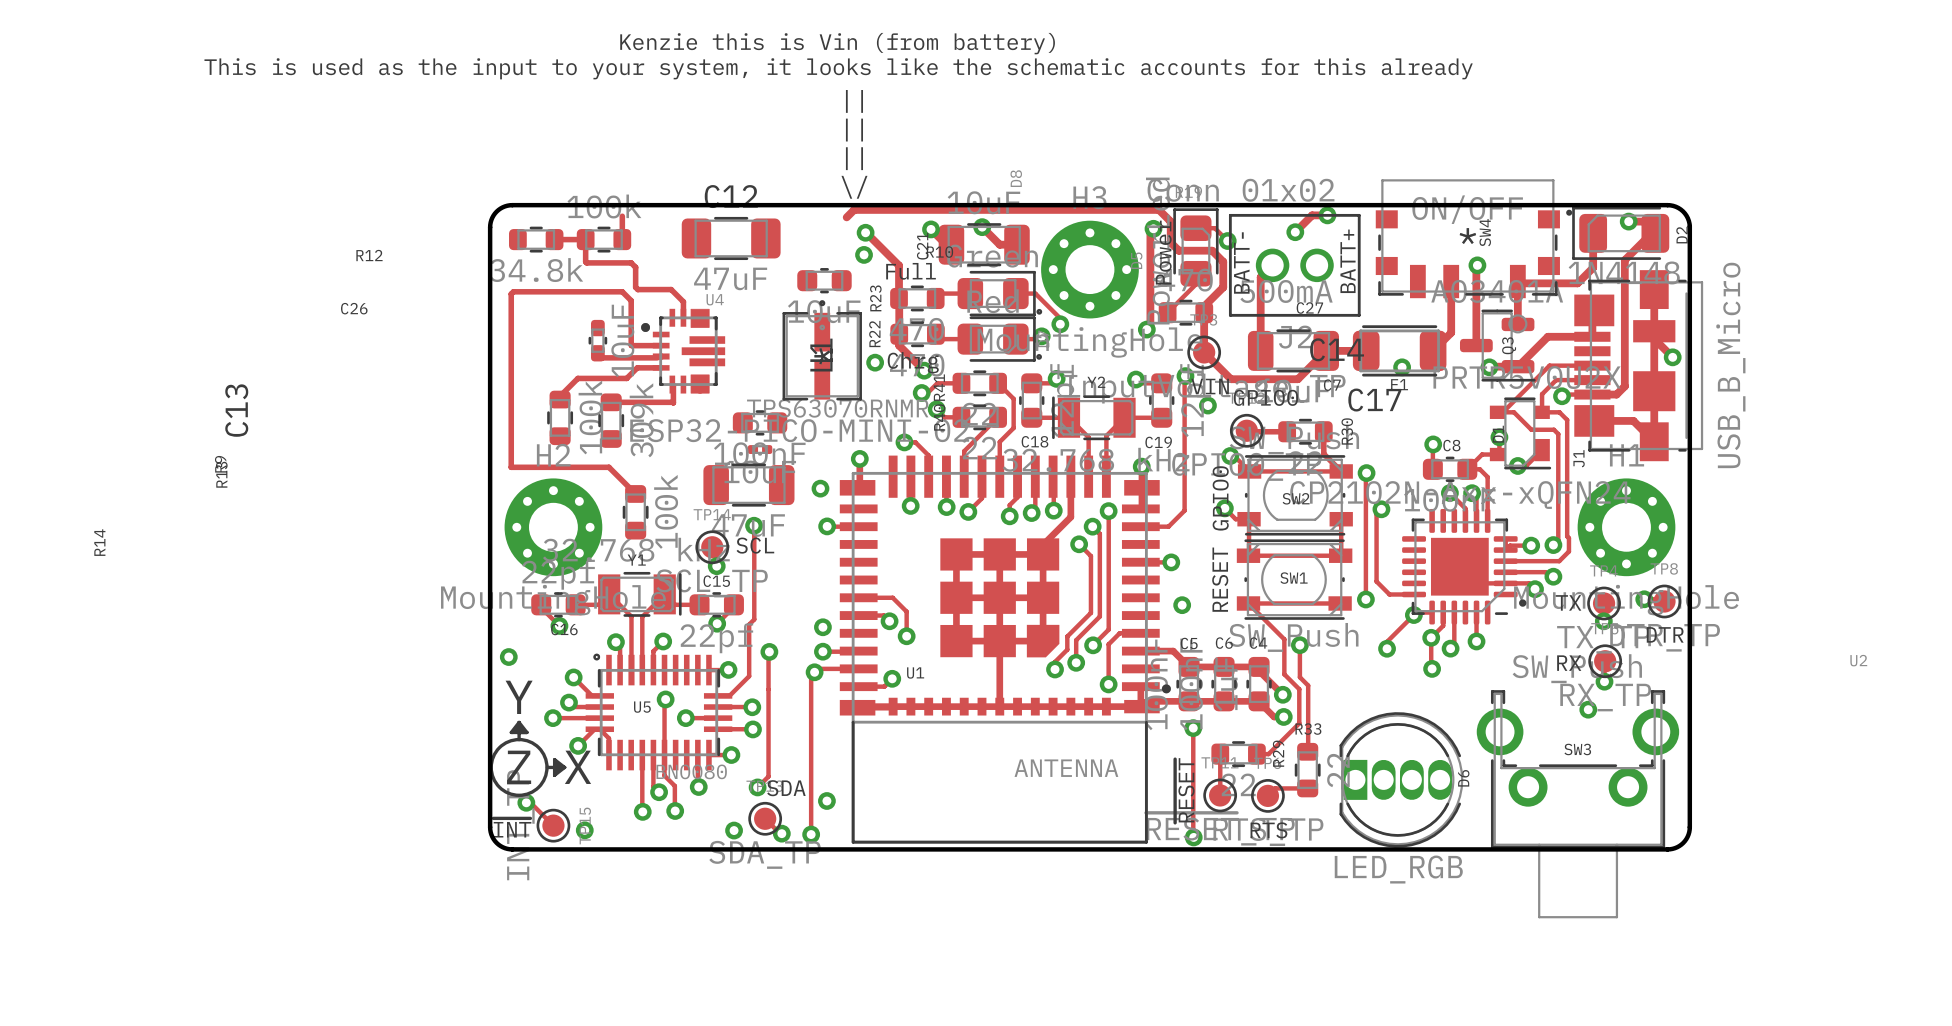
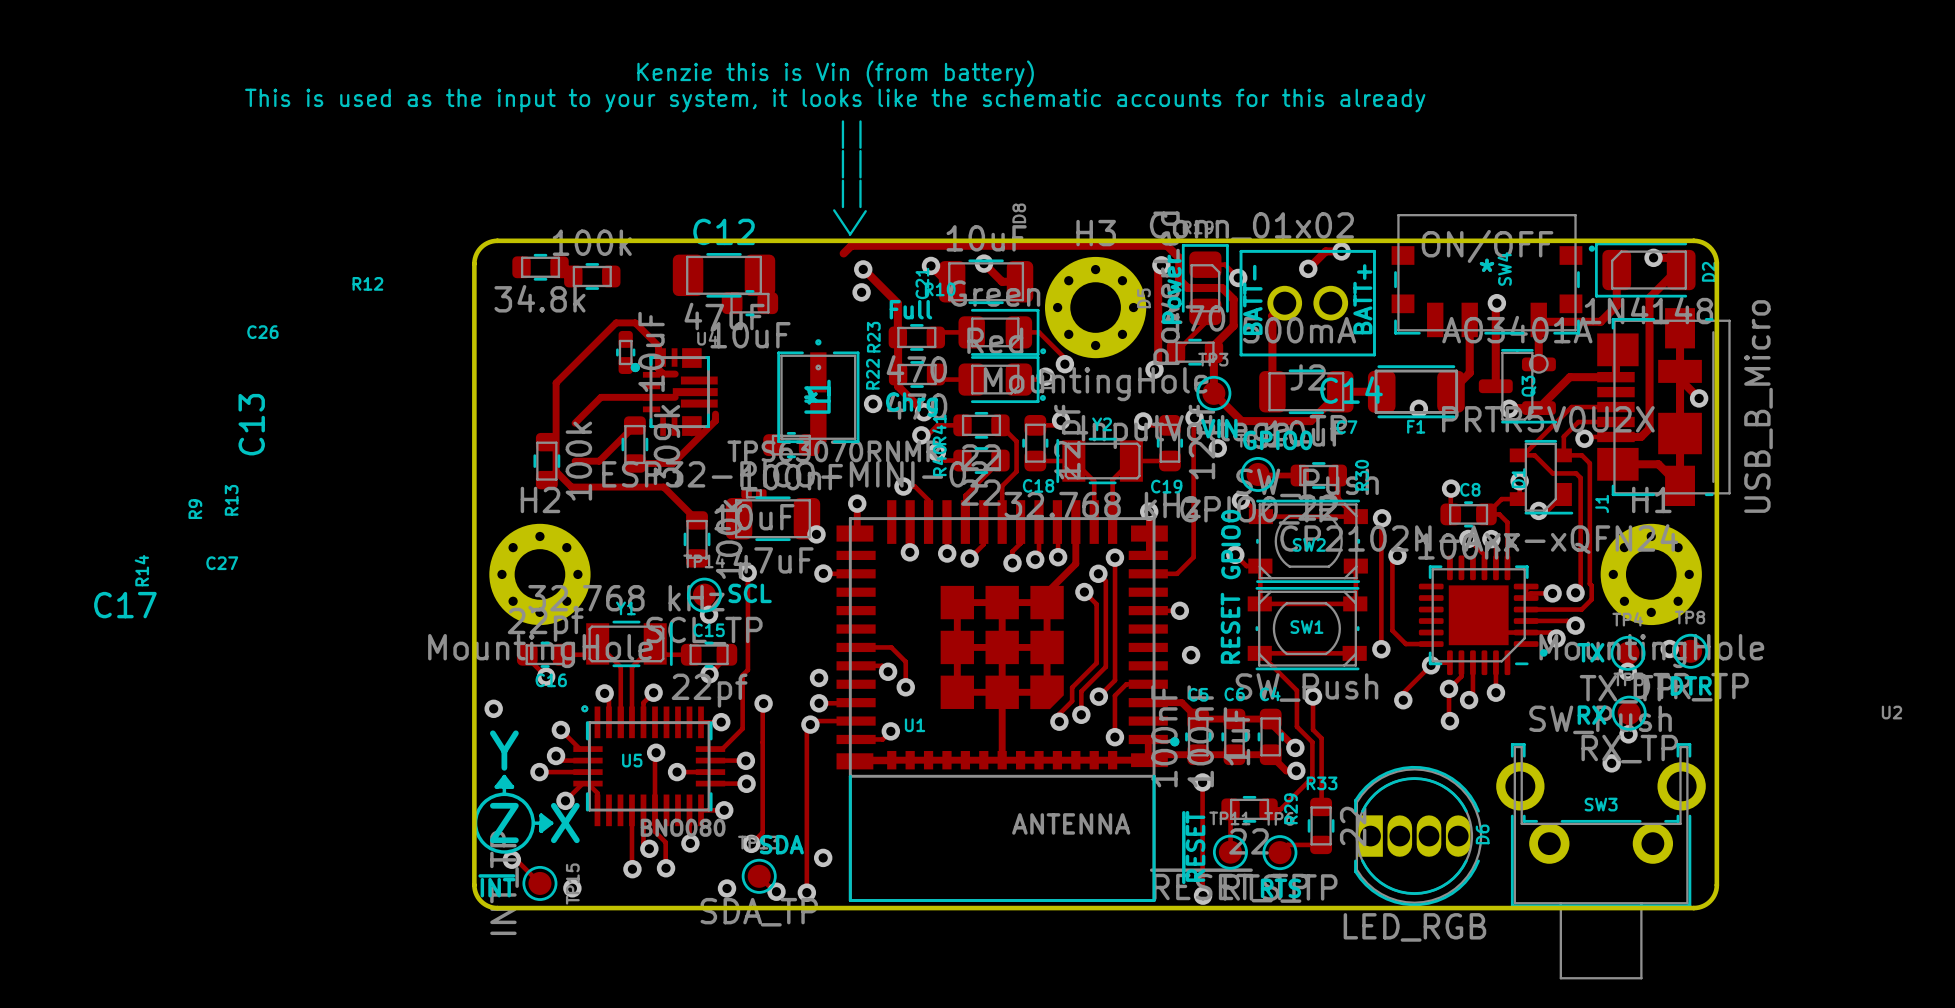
track: (622, 216) (622, 239) -> none
R12 position: (536, 239) -> (540, 267)
track: (554, 239) (585, 239) (586, 262) (631, 262) (635, 267) (635, 287) (637, 289) (671, 289) (683, 301) (683, 317) -> none
C26 position: (824, 280) -> (749, 303)
C27 name position: C27 (1309, 308) -> C27 (222, 563)
track: none -> (675, 374) (663, 374) (658, 369) (658, 346) (635, 322) (616, 322) (556, 382) (556, 471) (571, 487) (663, 487) (697, 520)
C13 position: (597, 340) -> (625, 352)
track: (661, 345) (631, 345) (631, 300) (622, 291) (513, 291) (511, 294) (511, 467) (608, 467) (635, 493) -> none
track: (597, 353) (602, 357) (657, 357) -> none
track: none -> (675, 397) (600, 397) (575, 423)
track: (661, 367) (637, 367) (626, 378) (577, 378) (560, 396) (560, 399) -> none
track: none -> (715, 414) (715, 420) (672, 463) (634, 463)
track: none -> (634, 425) (599, 461) (575, 461)
track: (672, 384) (673, 402) (611, 402) -> none
C17 name position: C17 (1374, 400) -> C17 (125, 605)
R13 position: (611, 420) -> (634, 444)
C27 position: (760, 422) -> (791, 445)
C17 position: (748, 485) -> (772, 518)
R14 position: (635, 512) -> (697, 539)

